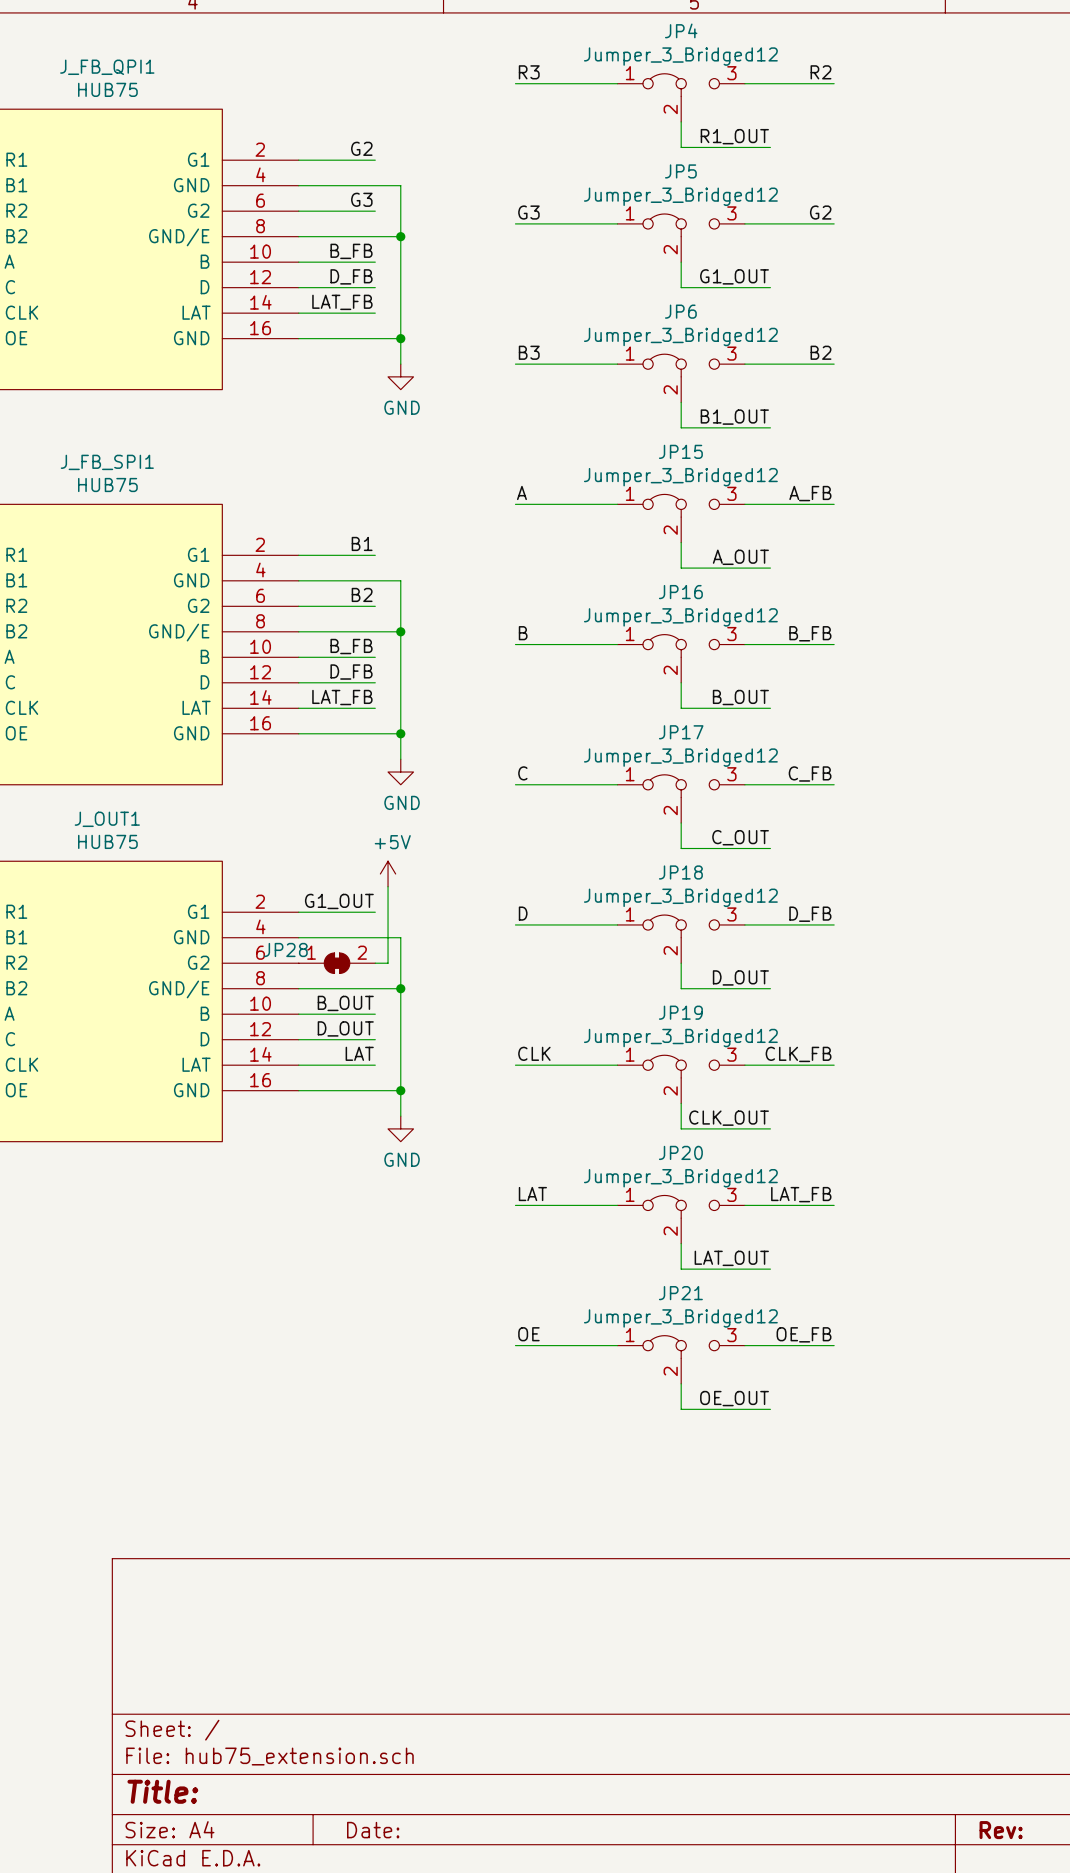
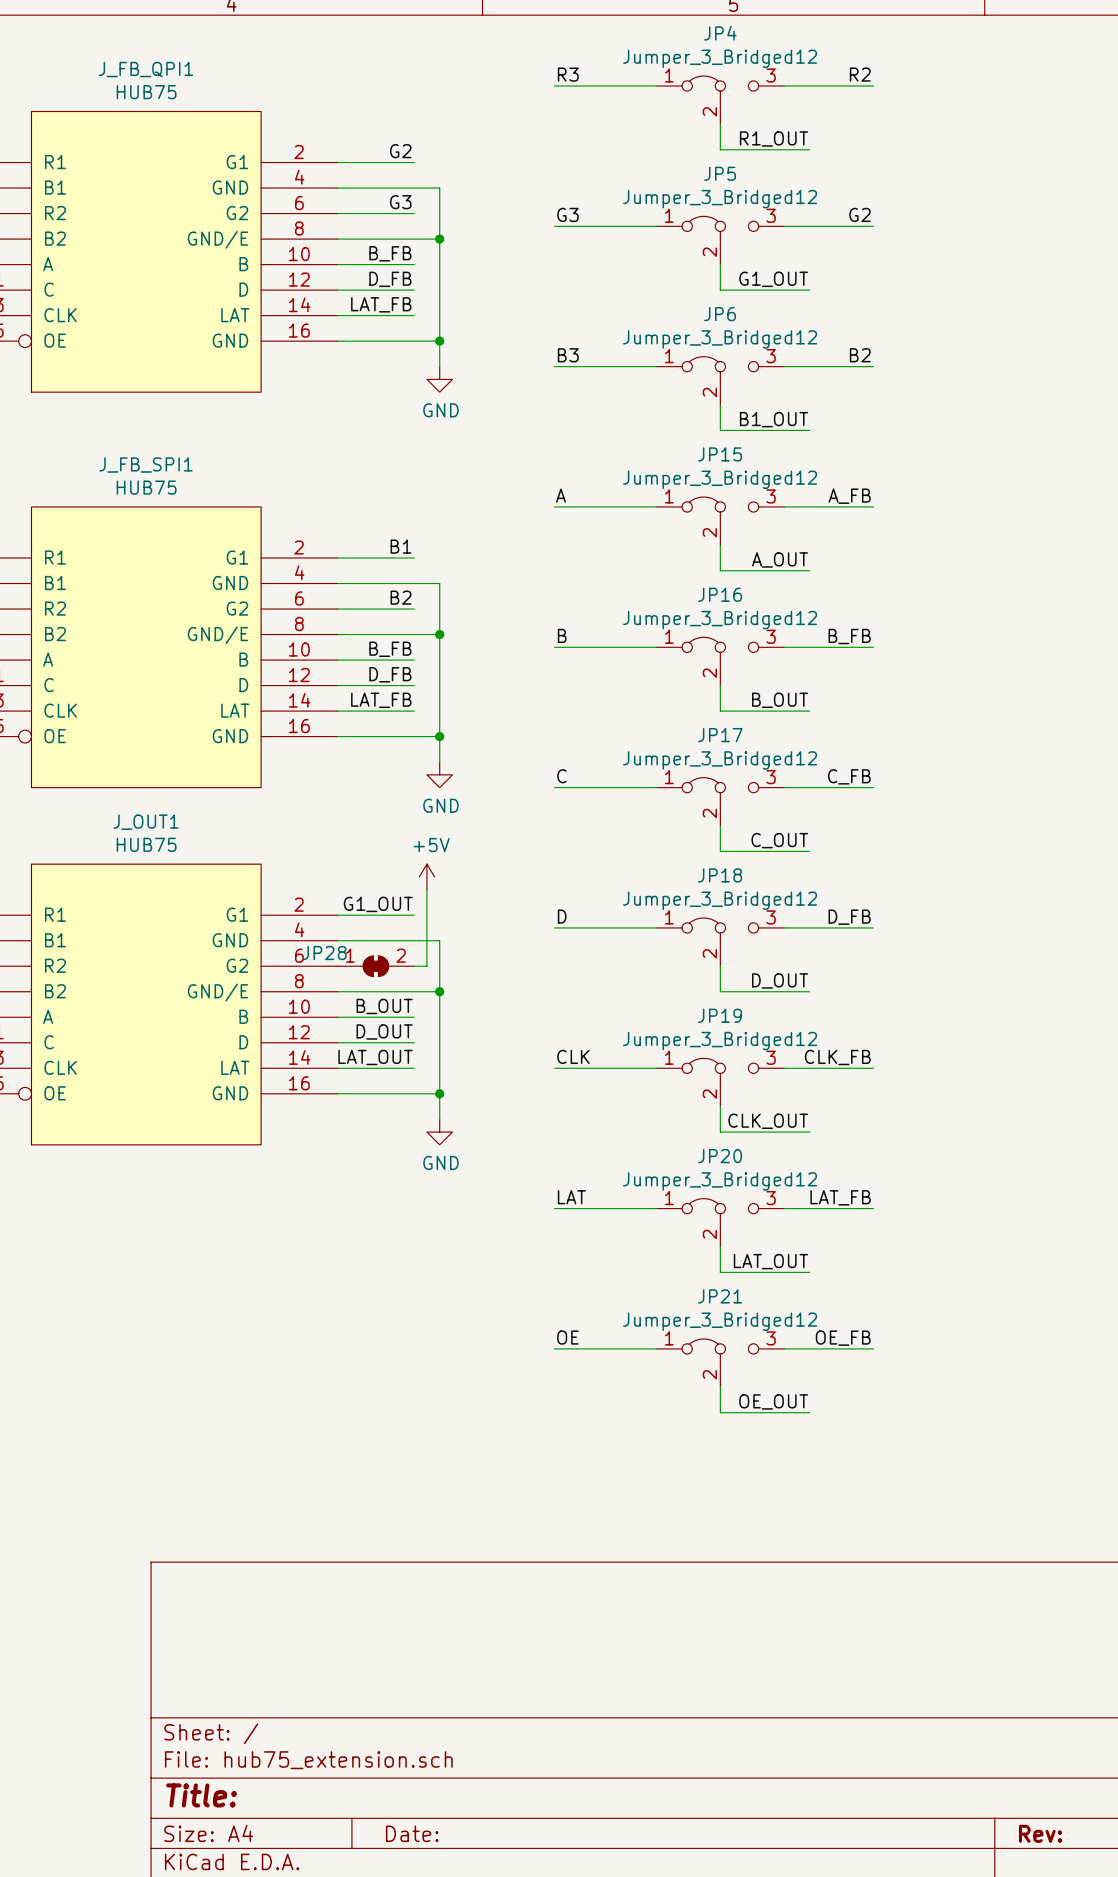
label: LAT (359, 1053) -> LAT_OUT (375, 1057)

